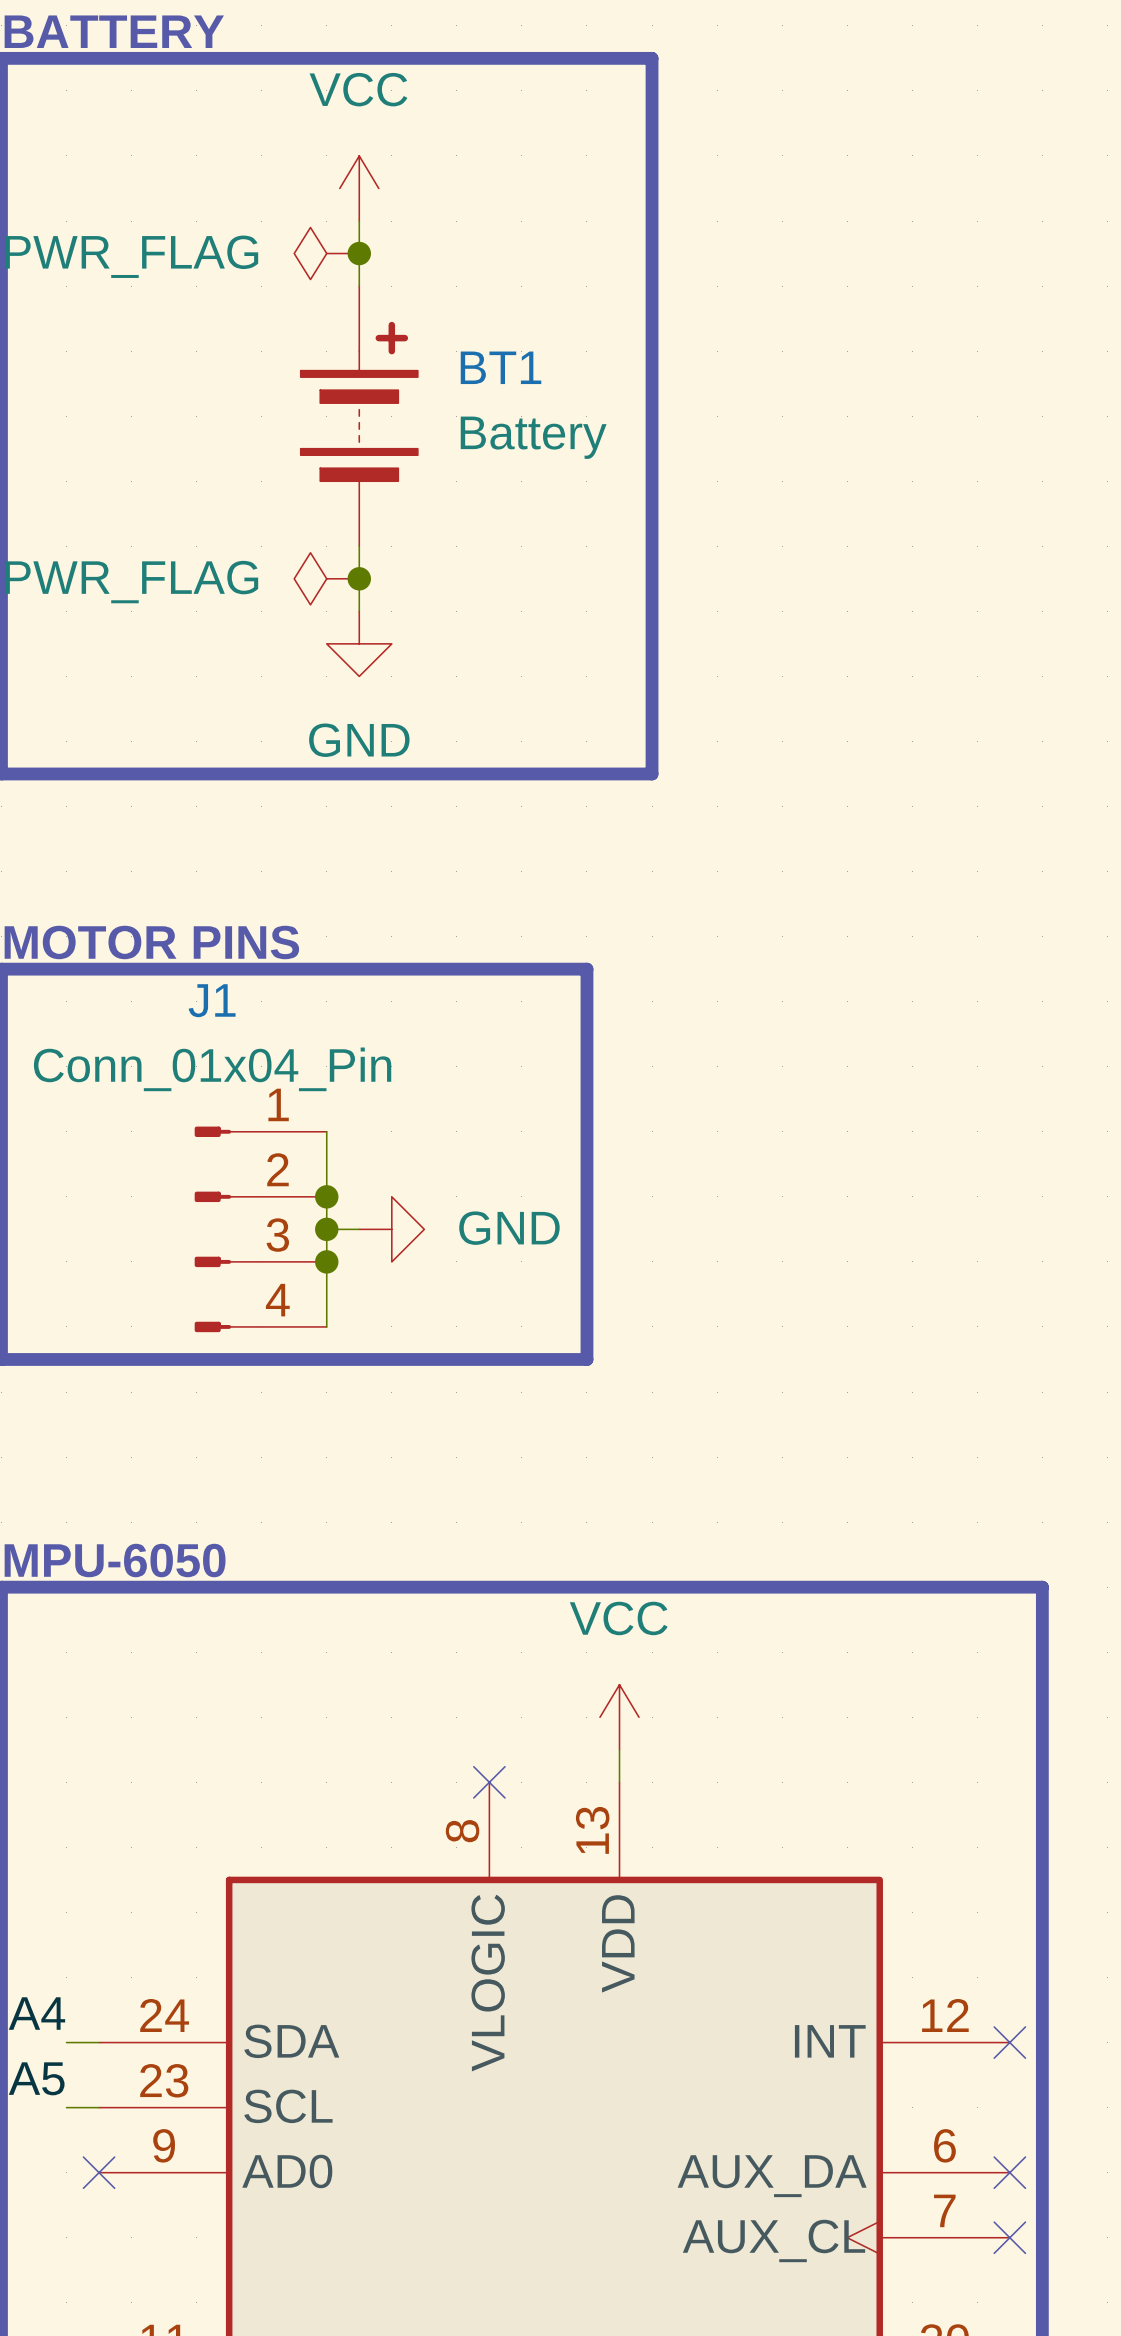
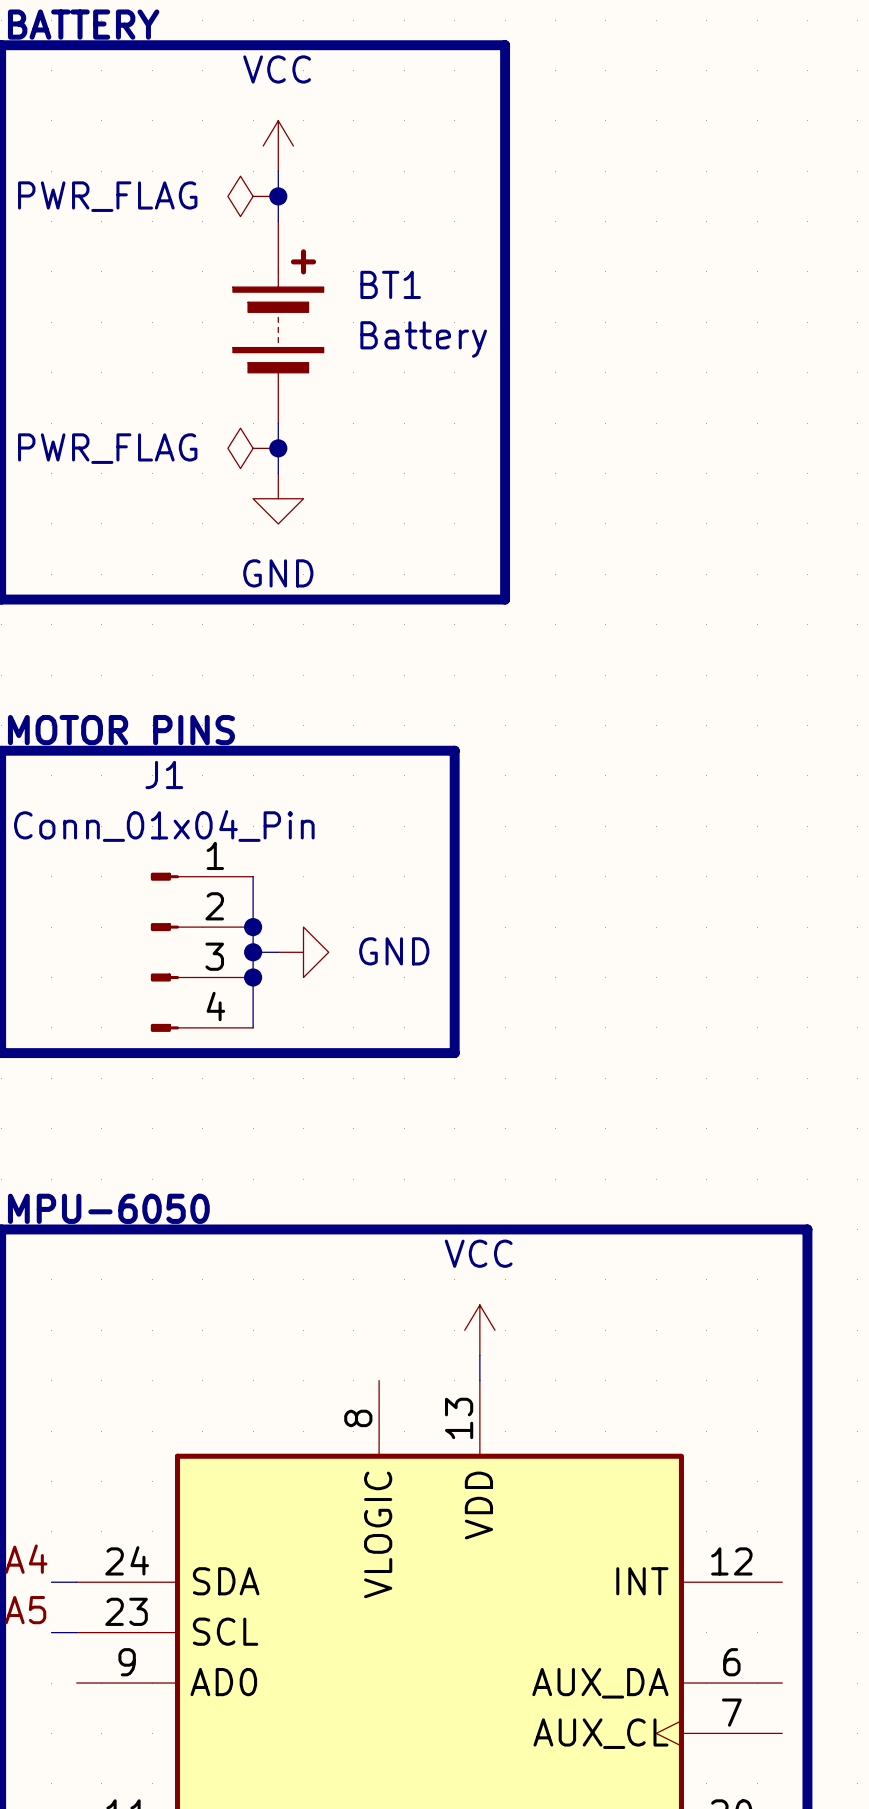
no-connect mark: (489, 1782) -> none
no-connect mark: (1009, 2042) -> none
no-connect mark: (99, 2172) -> none
no-connect mark: (1009, 2172) -> none
no-connect mark: (1009, 2237) -> none

